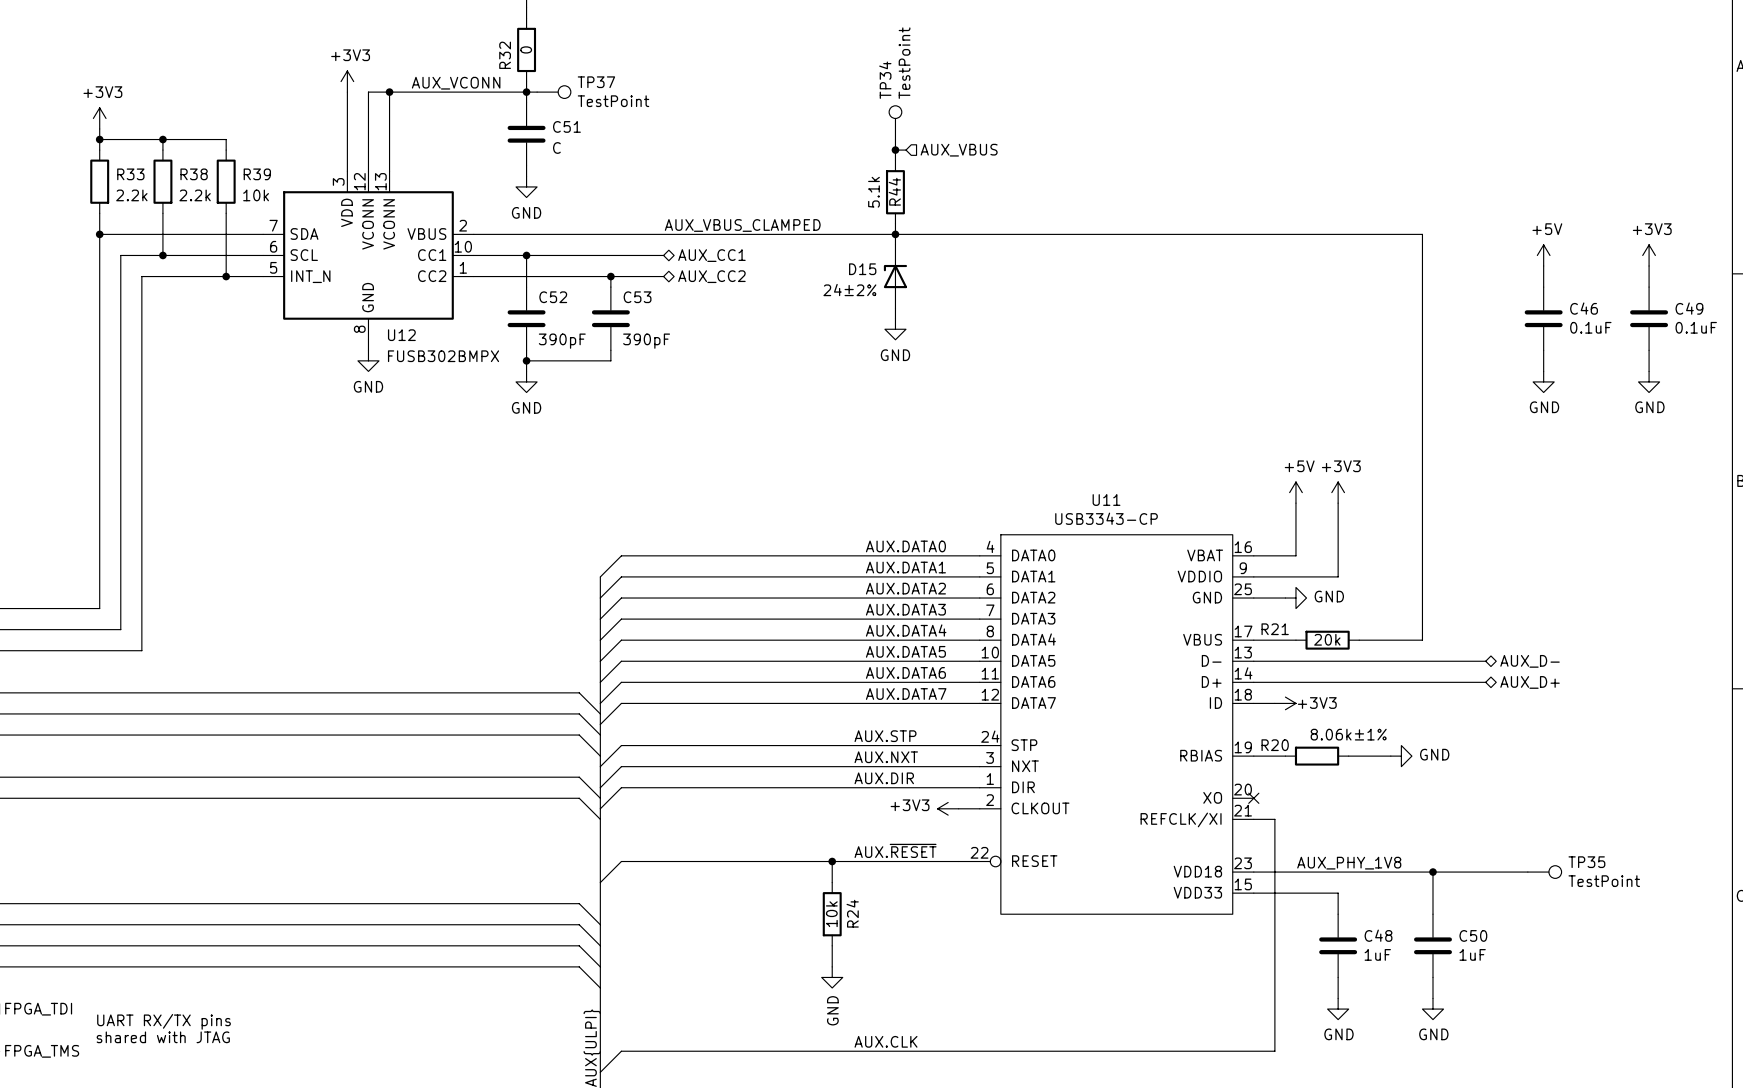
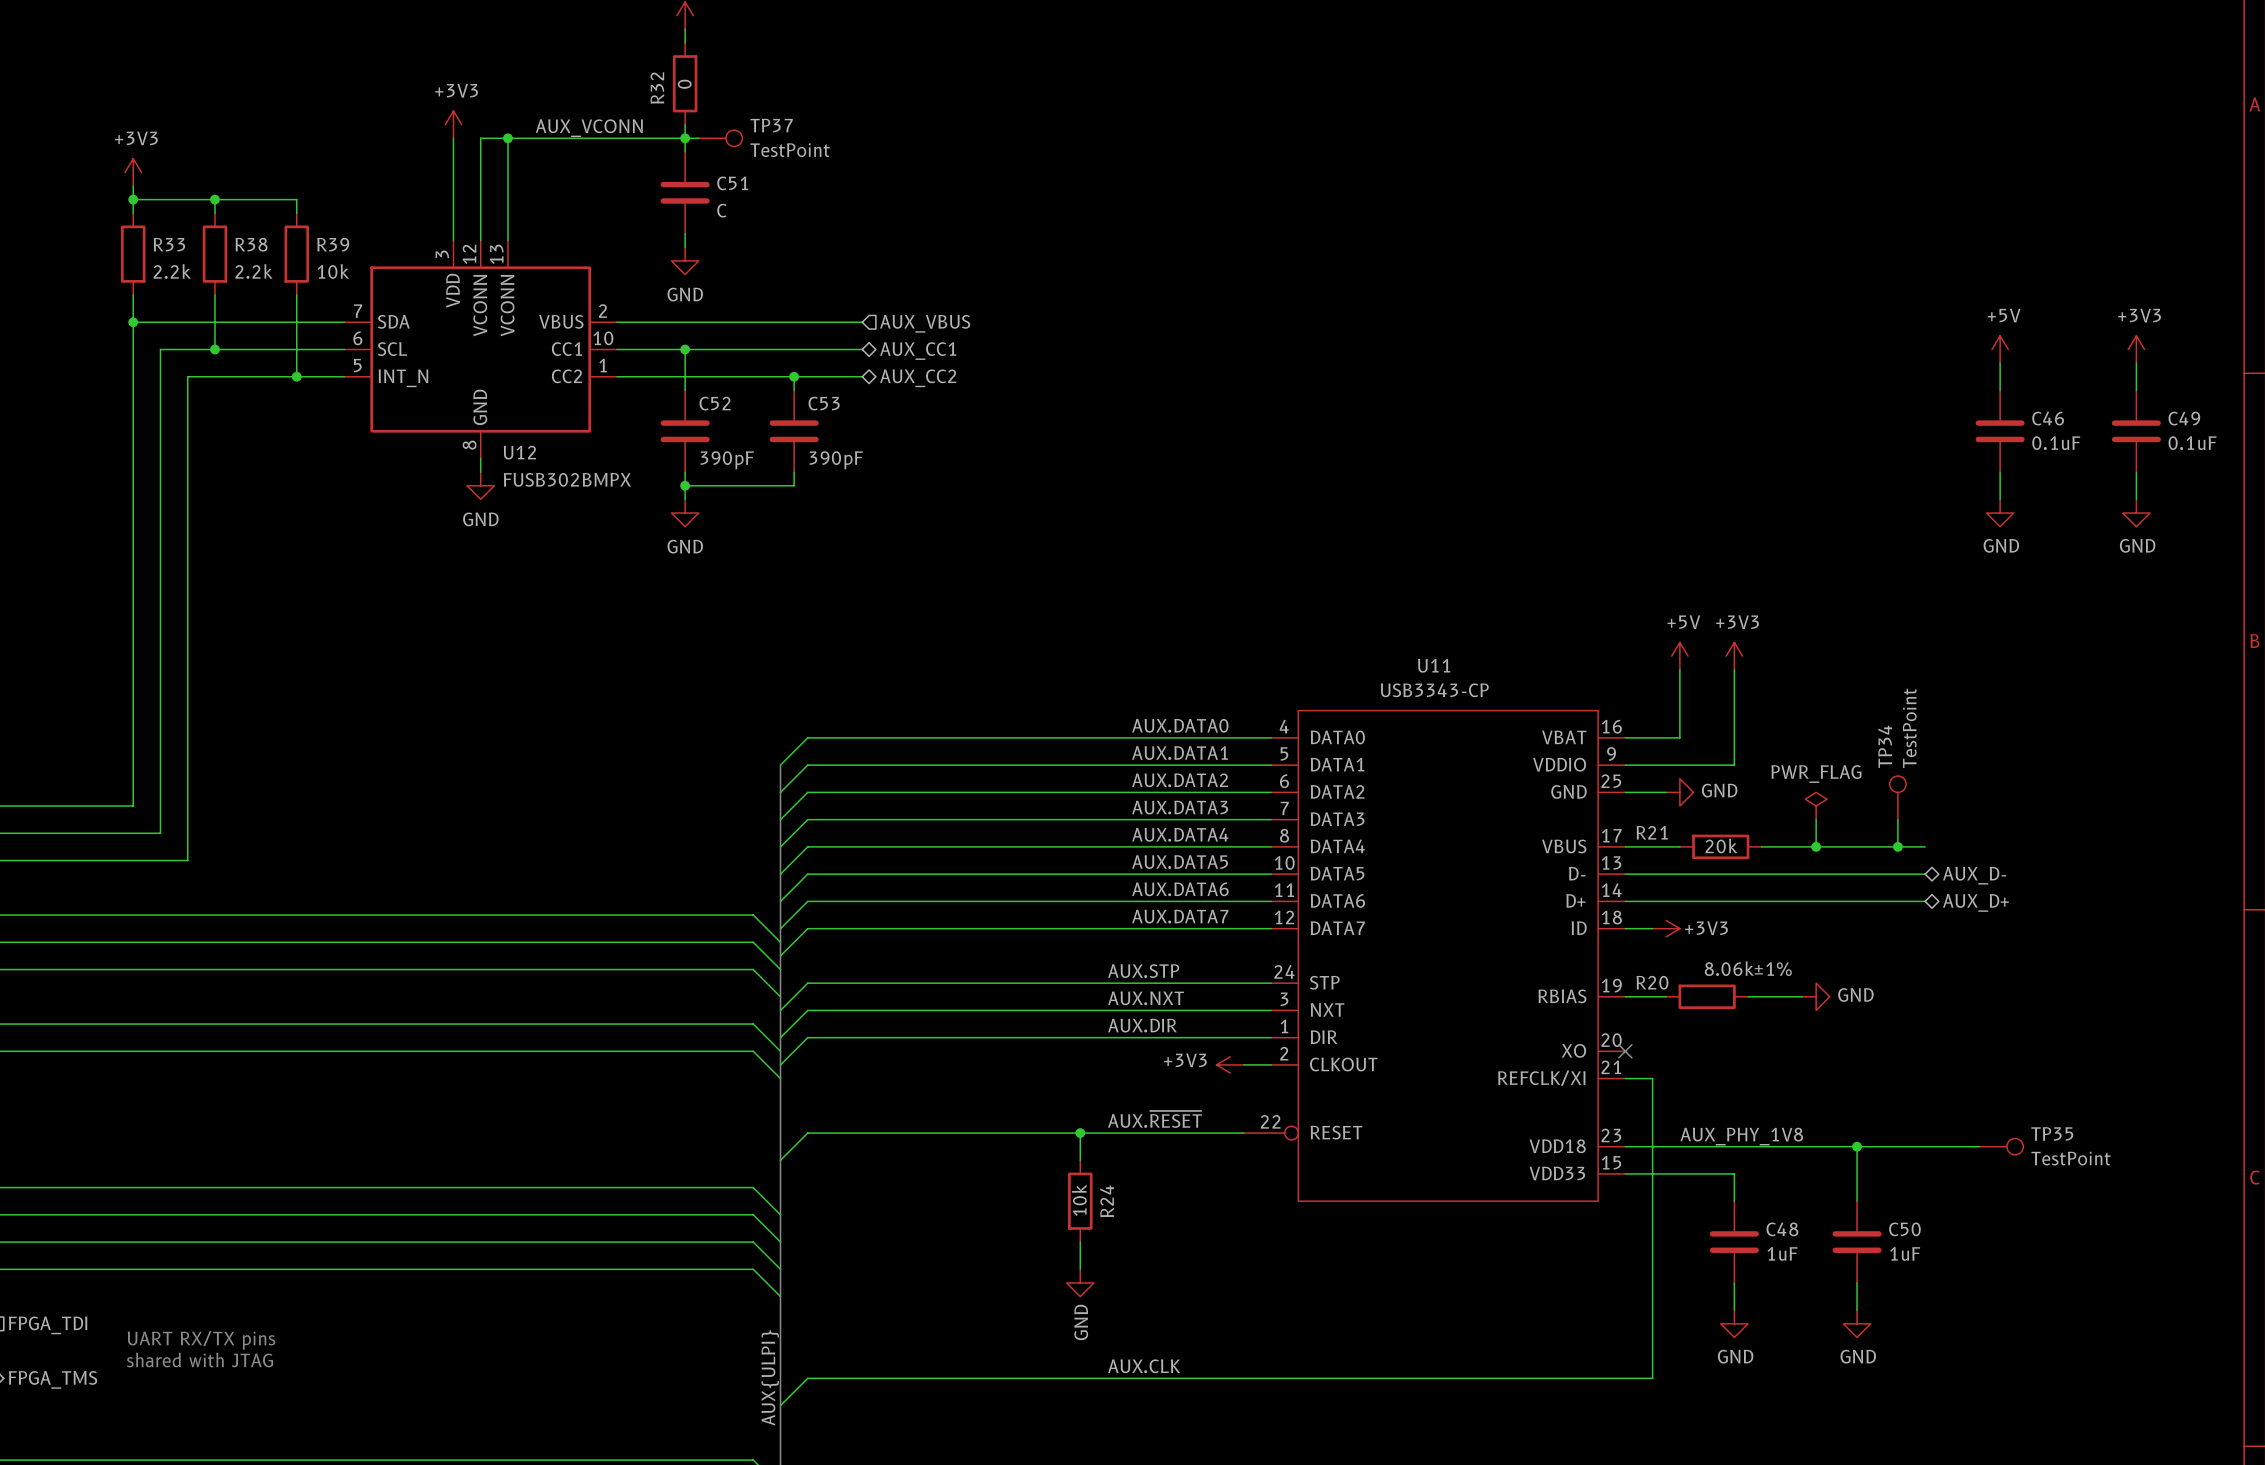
TP34 position: (895, 122) -> (1897, 797)
wire: (895, 139) (895, 160) -> none
wire: (895, 150) (906, 150) -> none
junction: (895, 150) -> none
hierarchical label: AUX_VBUS (959, 150) -> none
R44: 5.1k (895, 192) -> none
wire: (895, 223) (895, 244) -> none
label: AUX_VBUS_CLAMPED (742, 225) -> none
wire: (663, 234) (1422, 234) (1422, 640) -> (1925, 846) (1843, 846)
hierarchical label: none -> AUX_VBUS (925, 323)
junction: (895, 234) -> none
D15: 24±2% (895, 276) -> none
wire: (895, 308) (895, 318) -> none
power symbol: GND (895, 329) -> none
power symbol: none -> PWR_FLAG (1816, 806)
wire: none -> (1816, 819) (1816, 846)
wire: none -> (1897, 819) (1897, 846)
junction: none -> (1816, 846)
junction: none -> (1897, 846)

